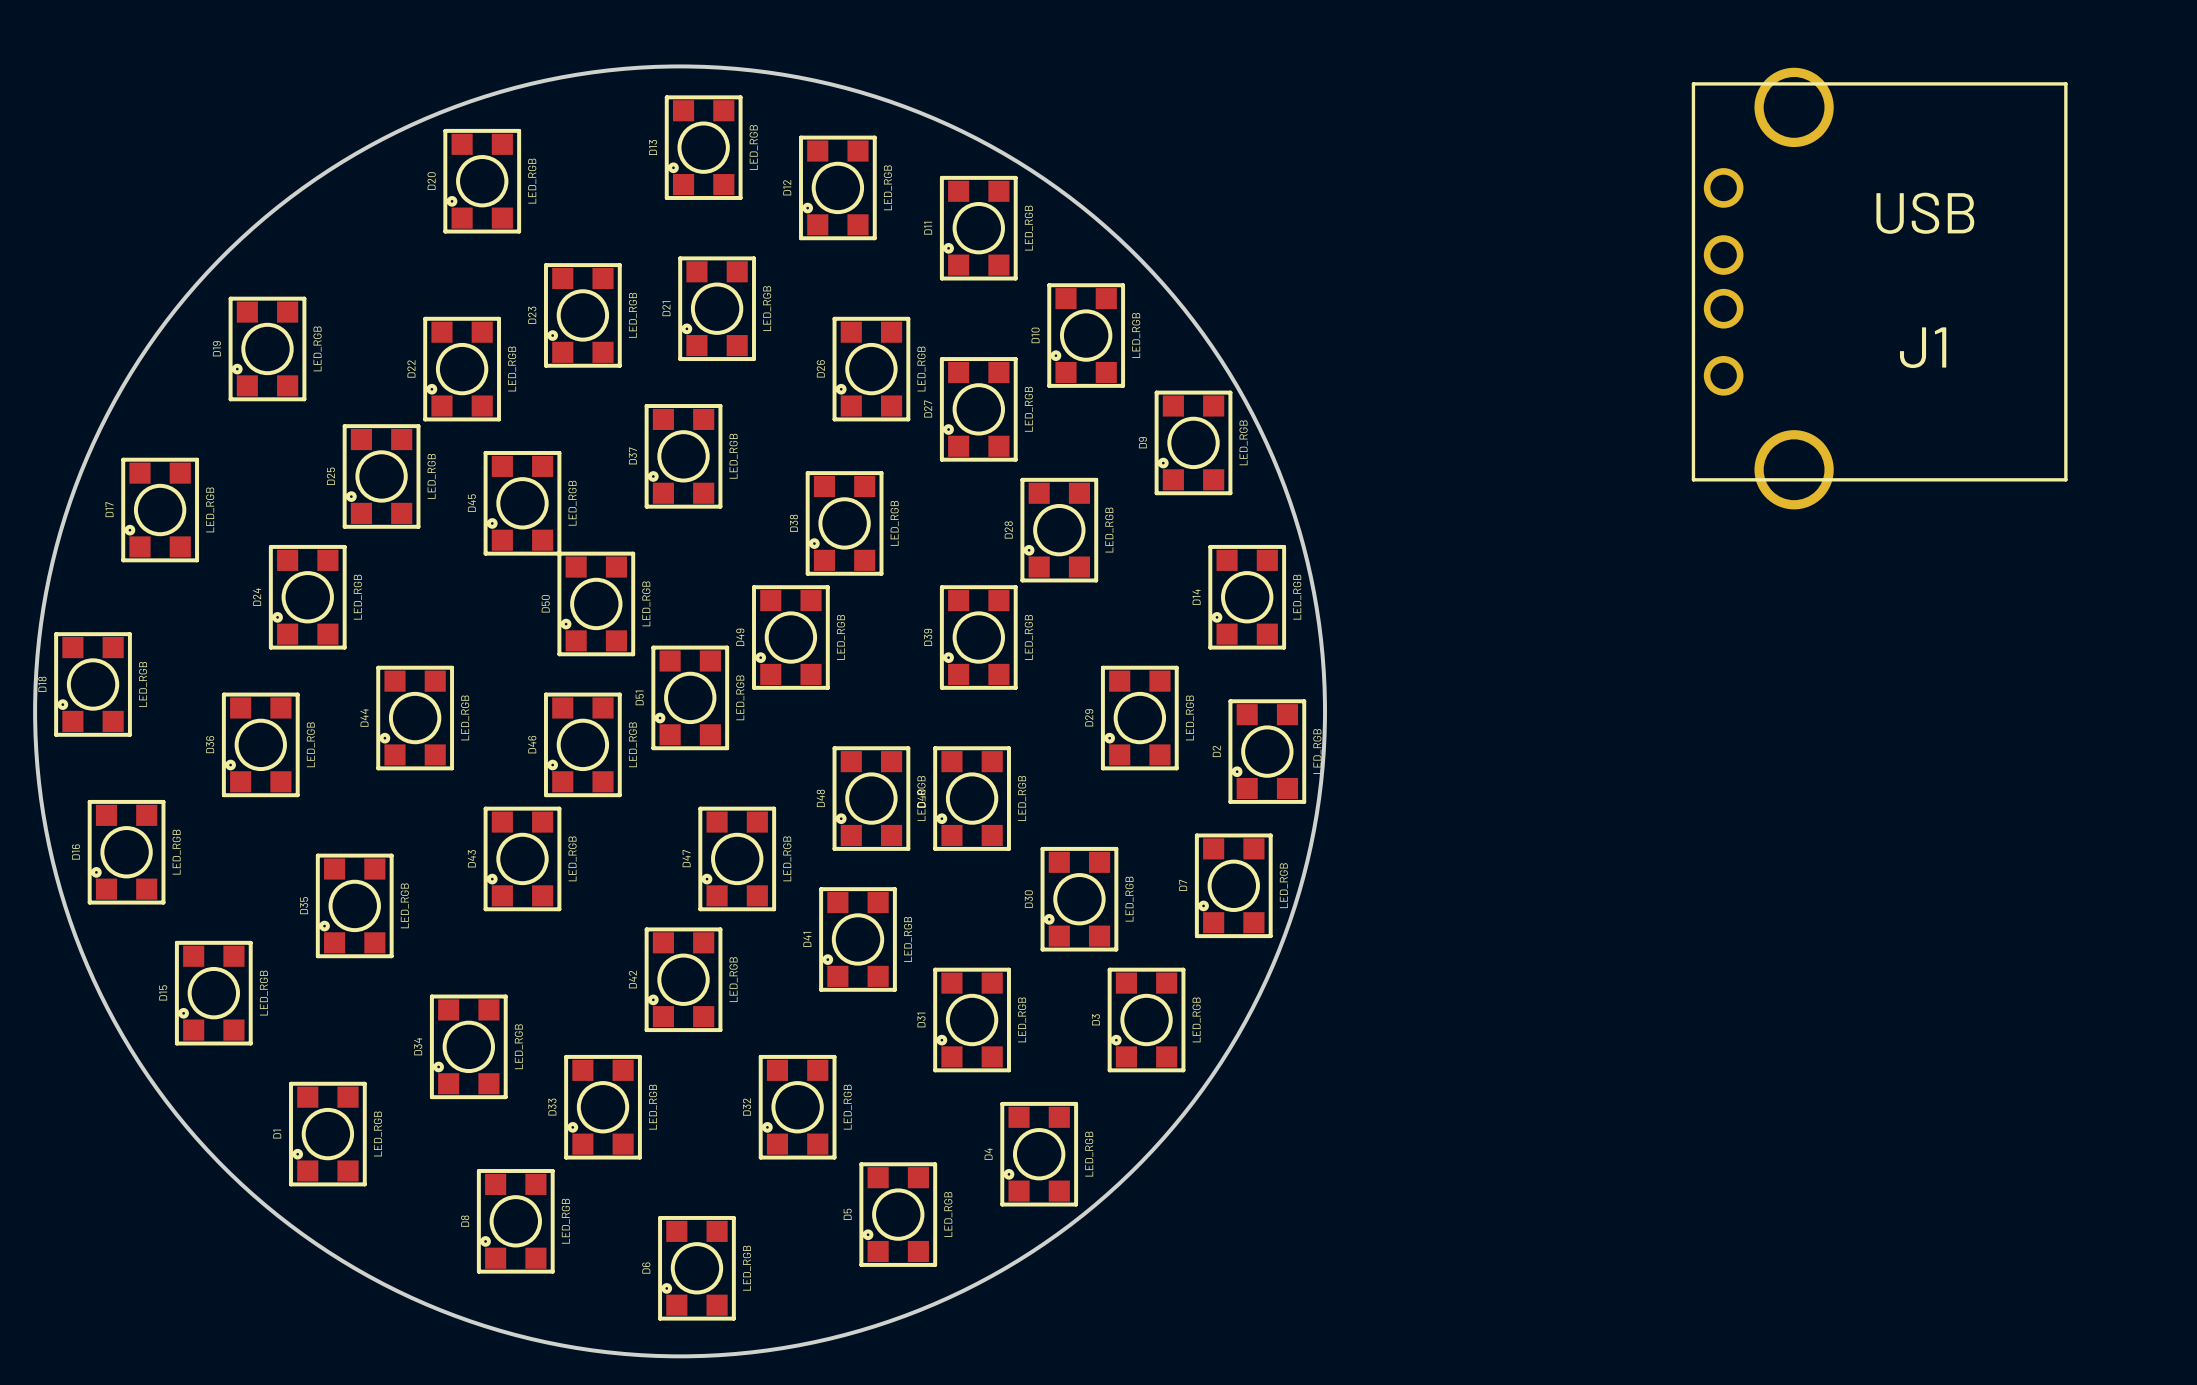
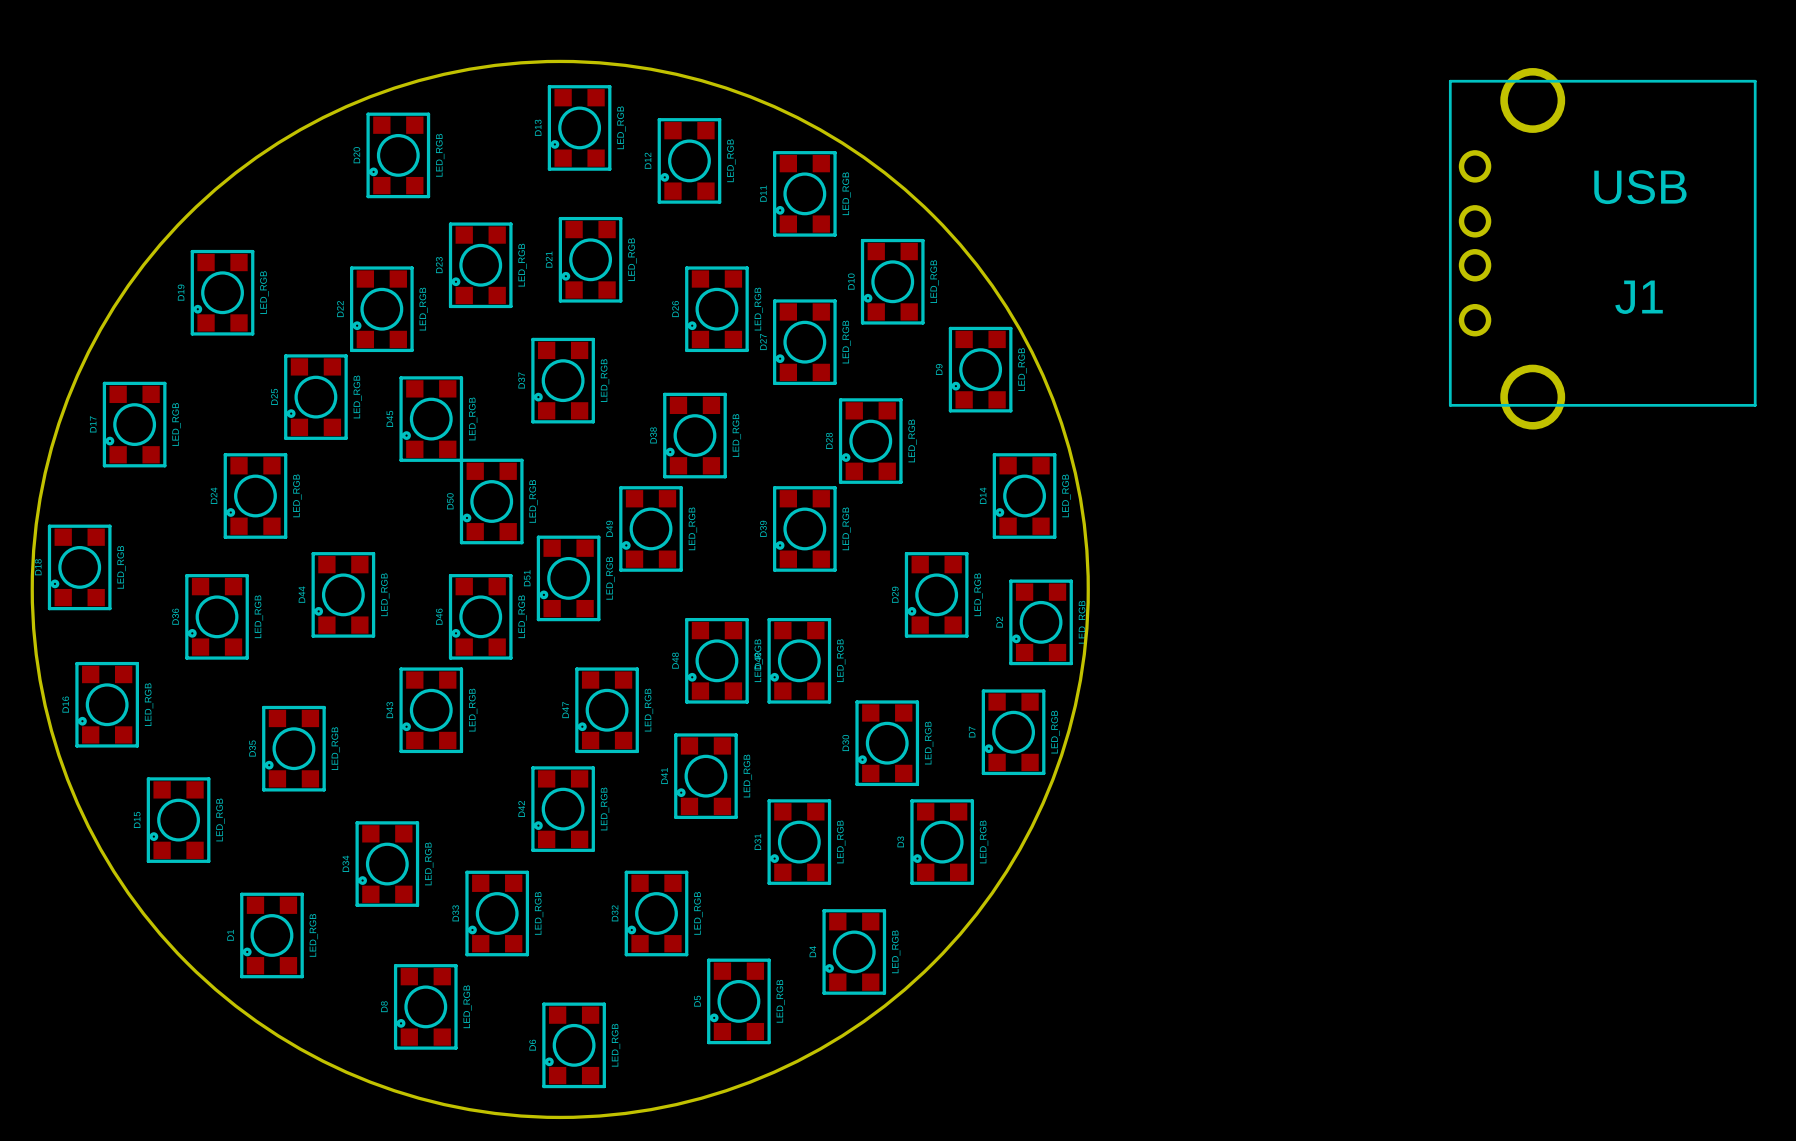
J1 position: (1879, 288) -> (1602, 248)

